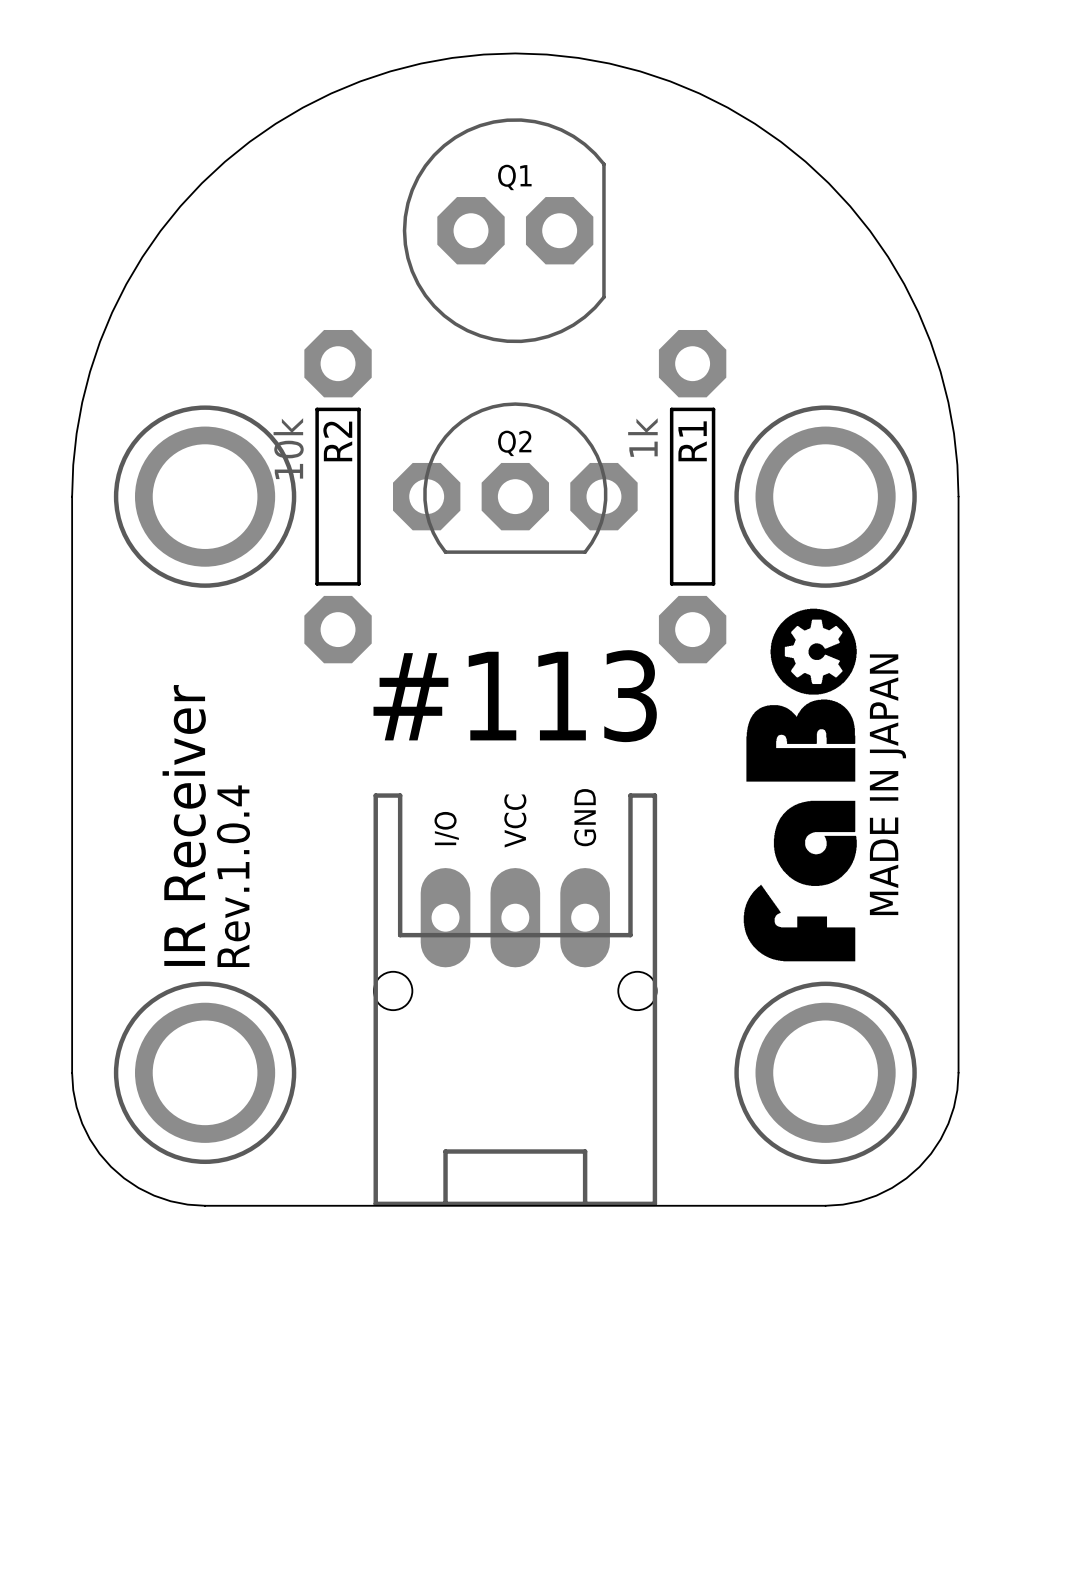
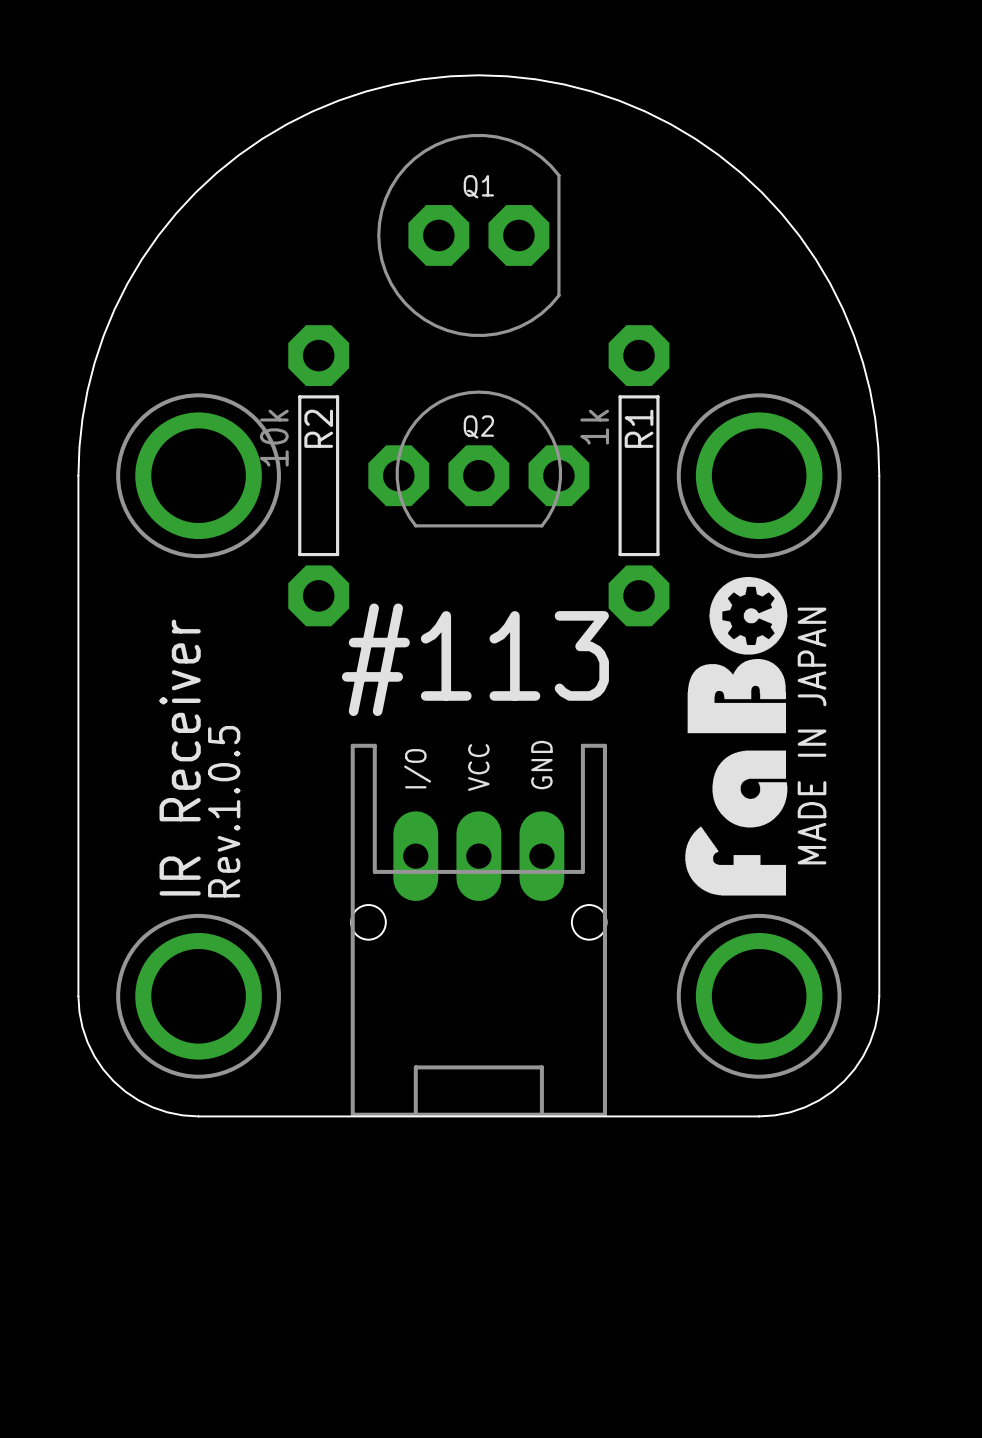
text: Rev.1.0.4 (233, 876) -> Rev.1.0.5 (224, 811)

